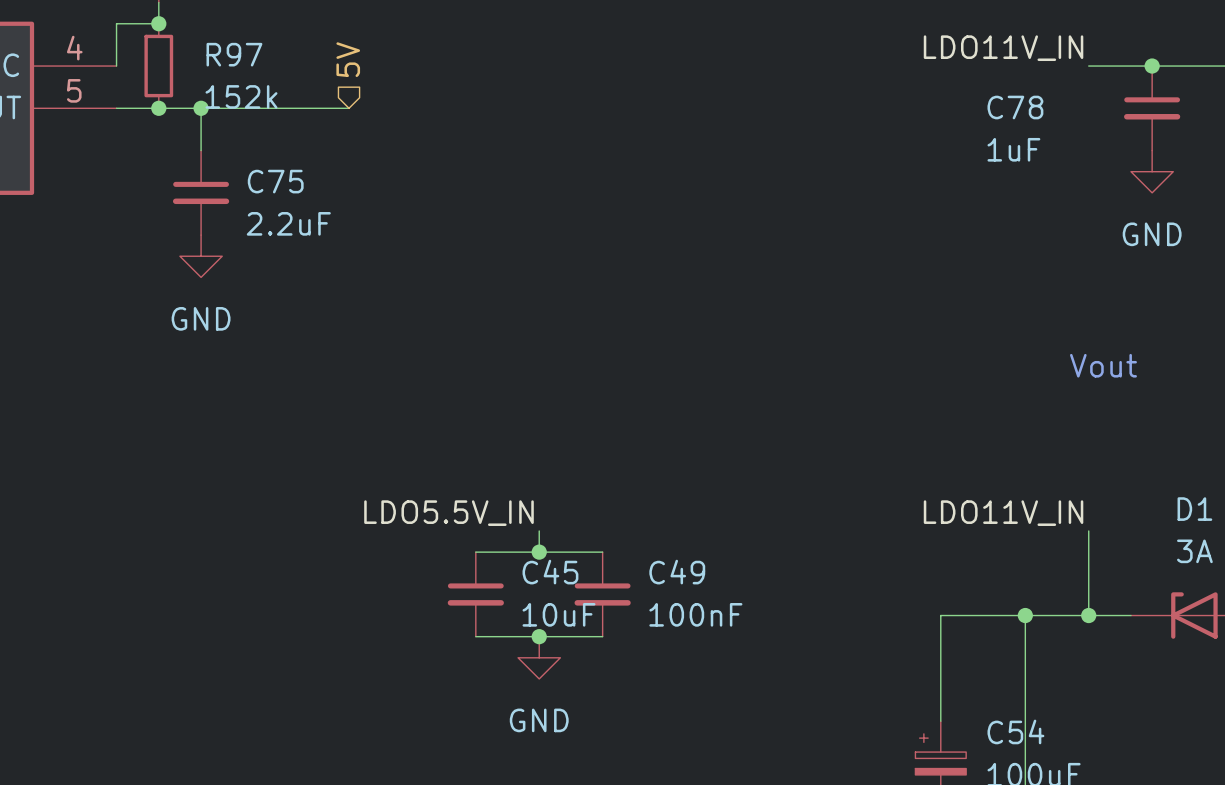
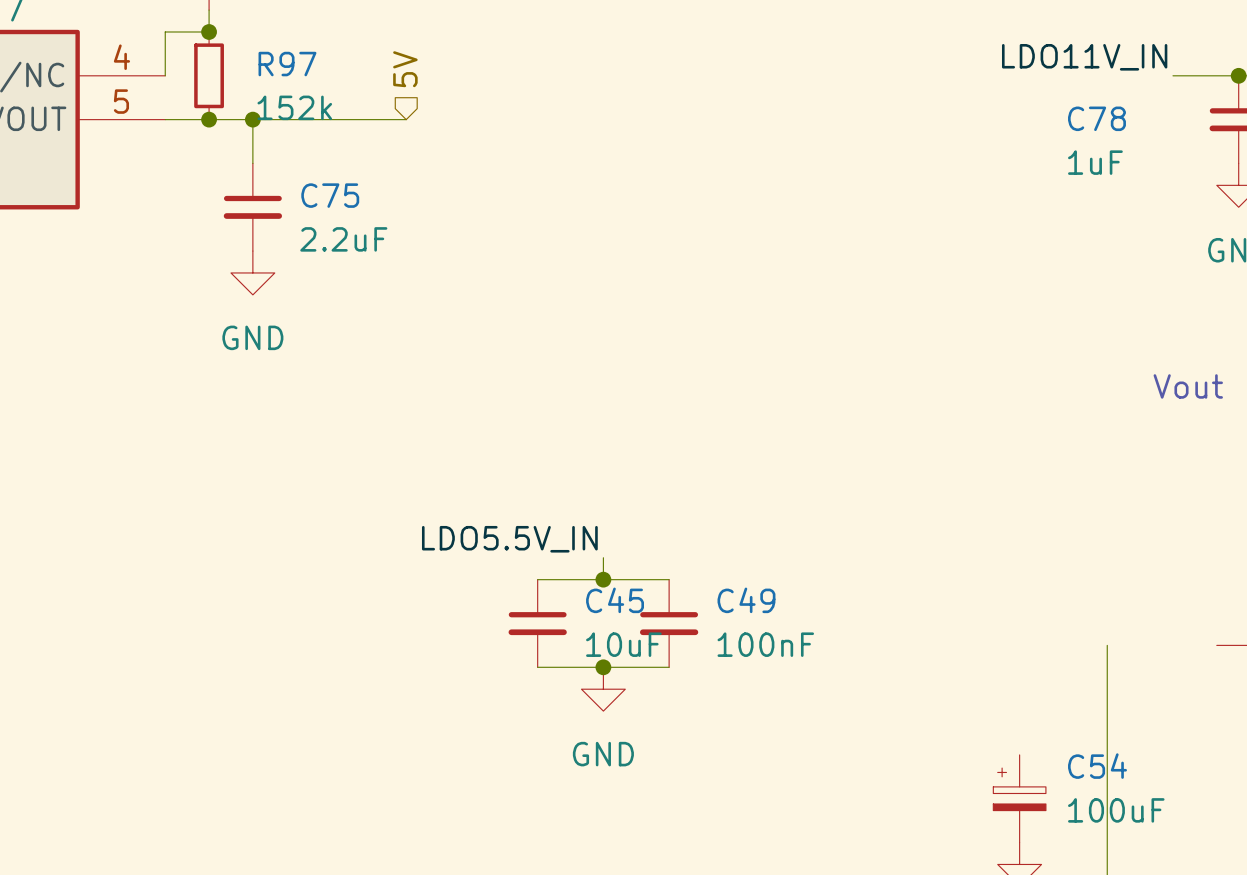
label: LDO11V_IN (1003, 513) -> none
wire: (1088, 530) (1088, 615) -> none
junction: (1025, 615) -> none
junction: (1088, 615) -> none
wire: (1131, 615) (940, 615) (940, 721) -> none

